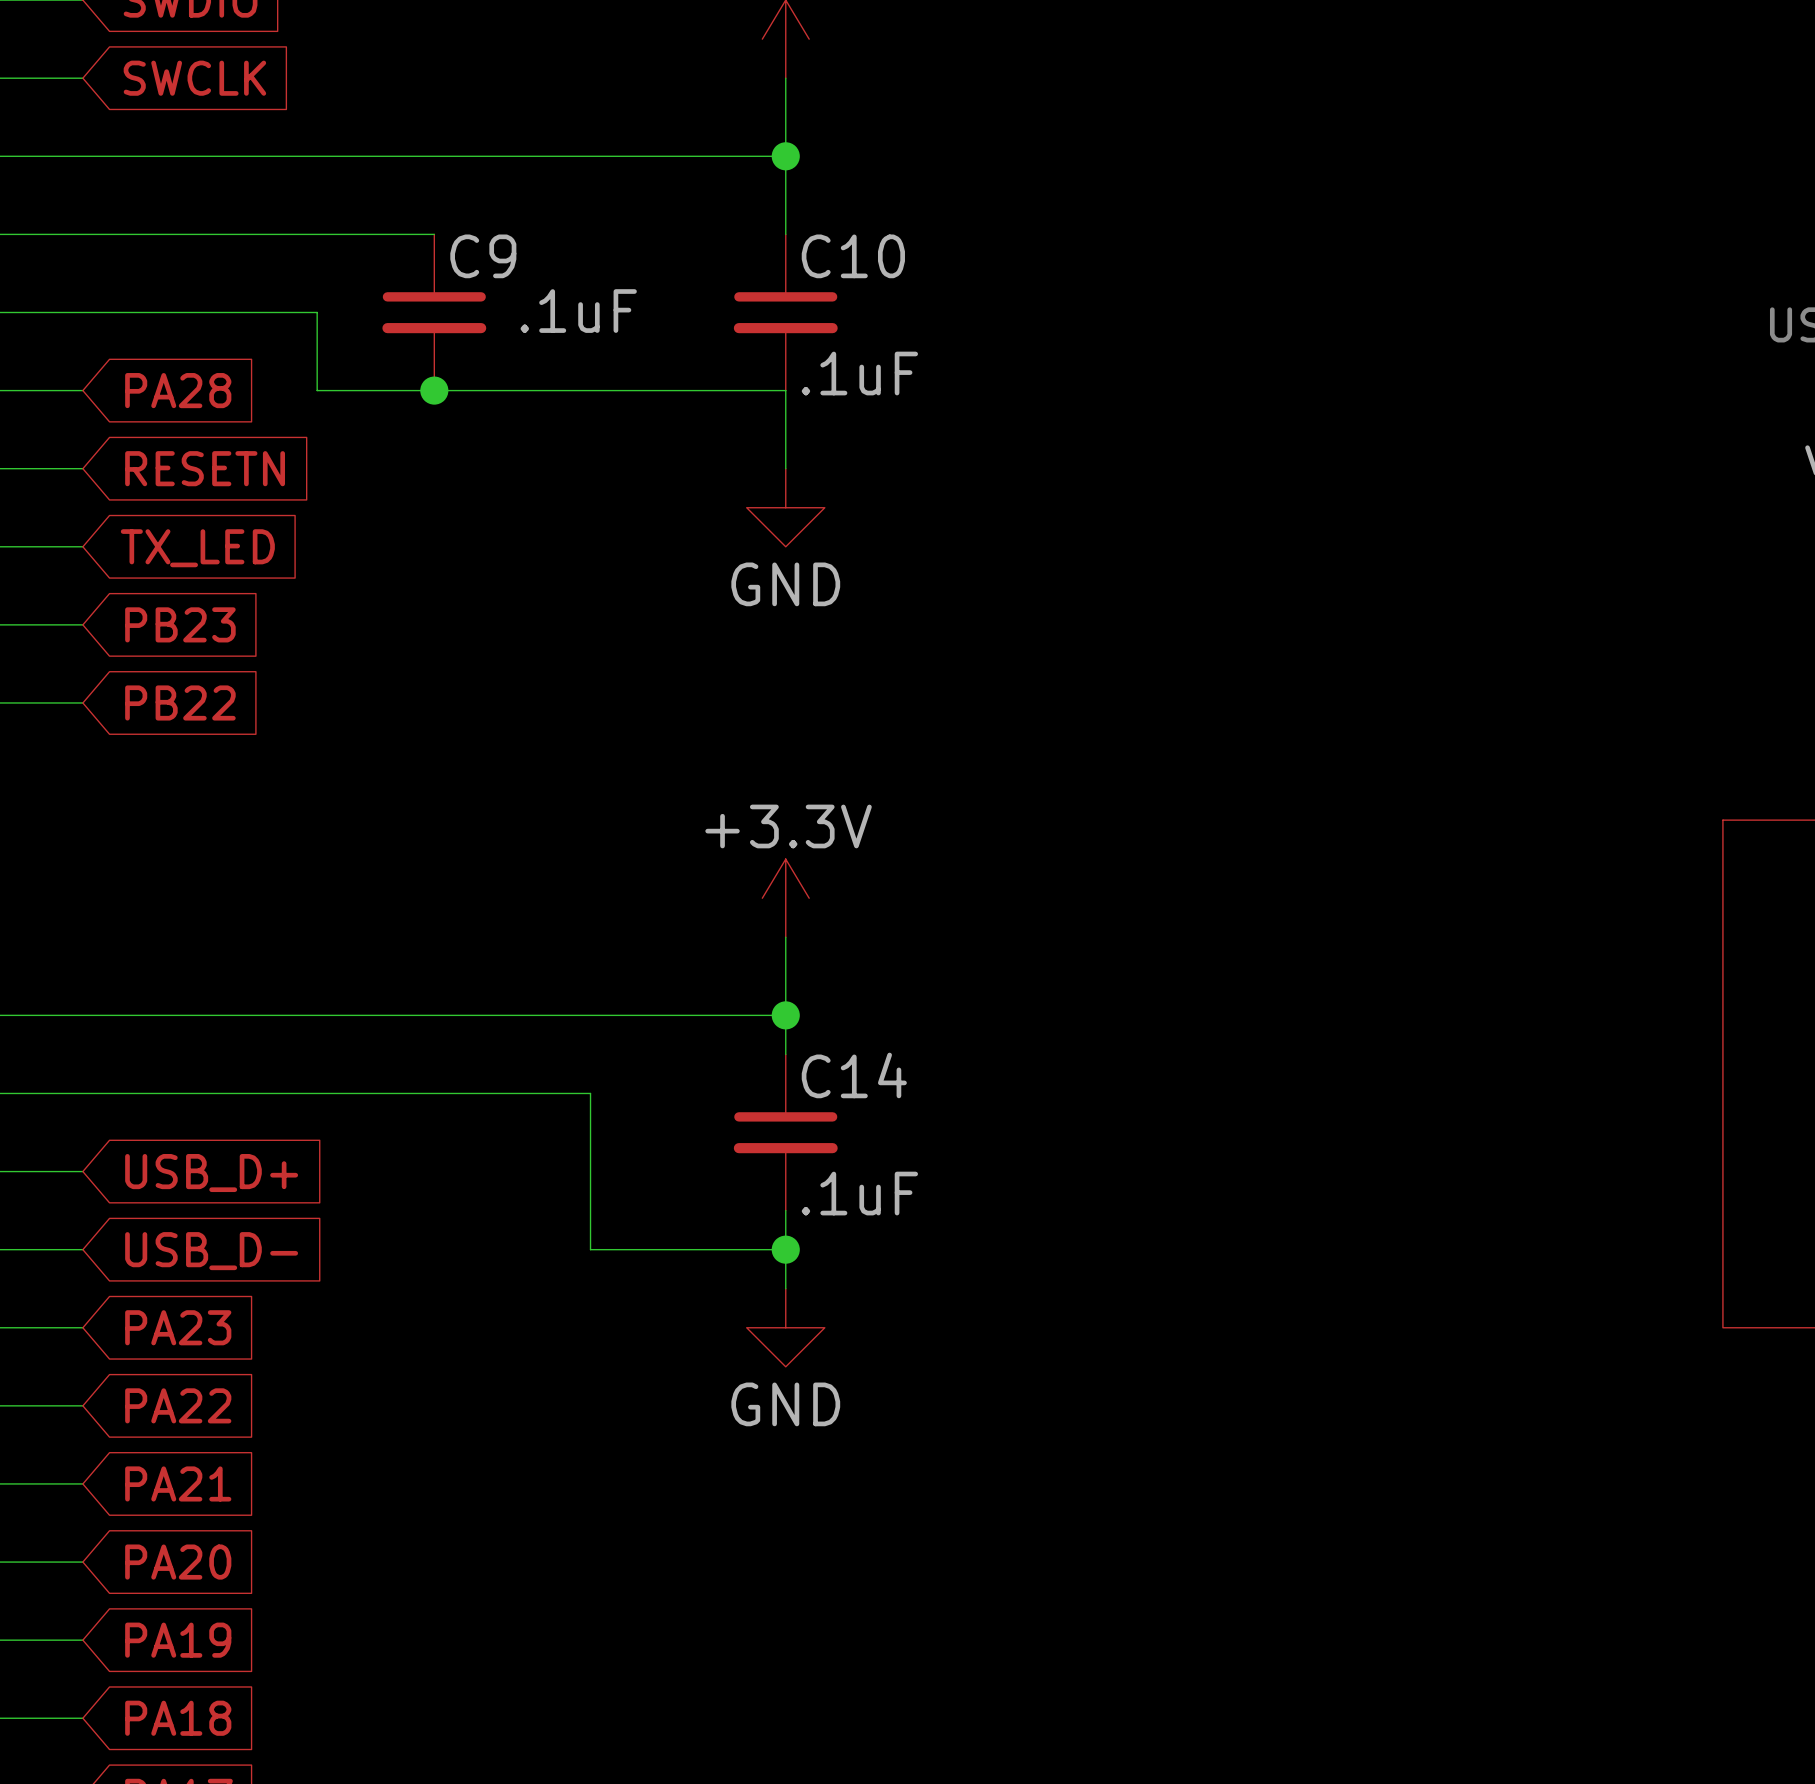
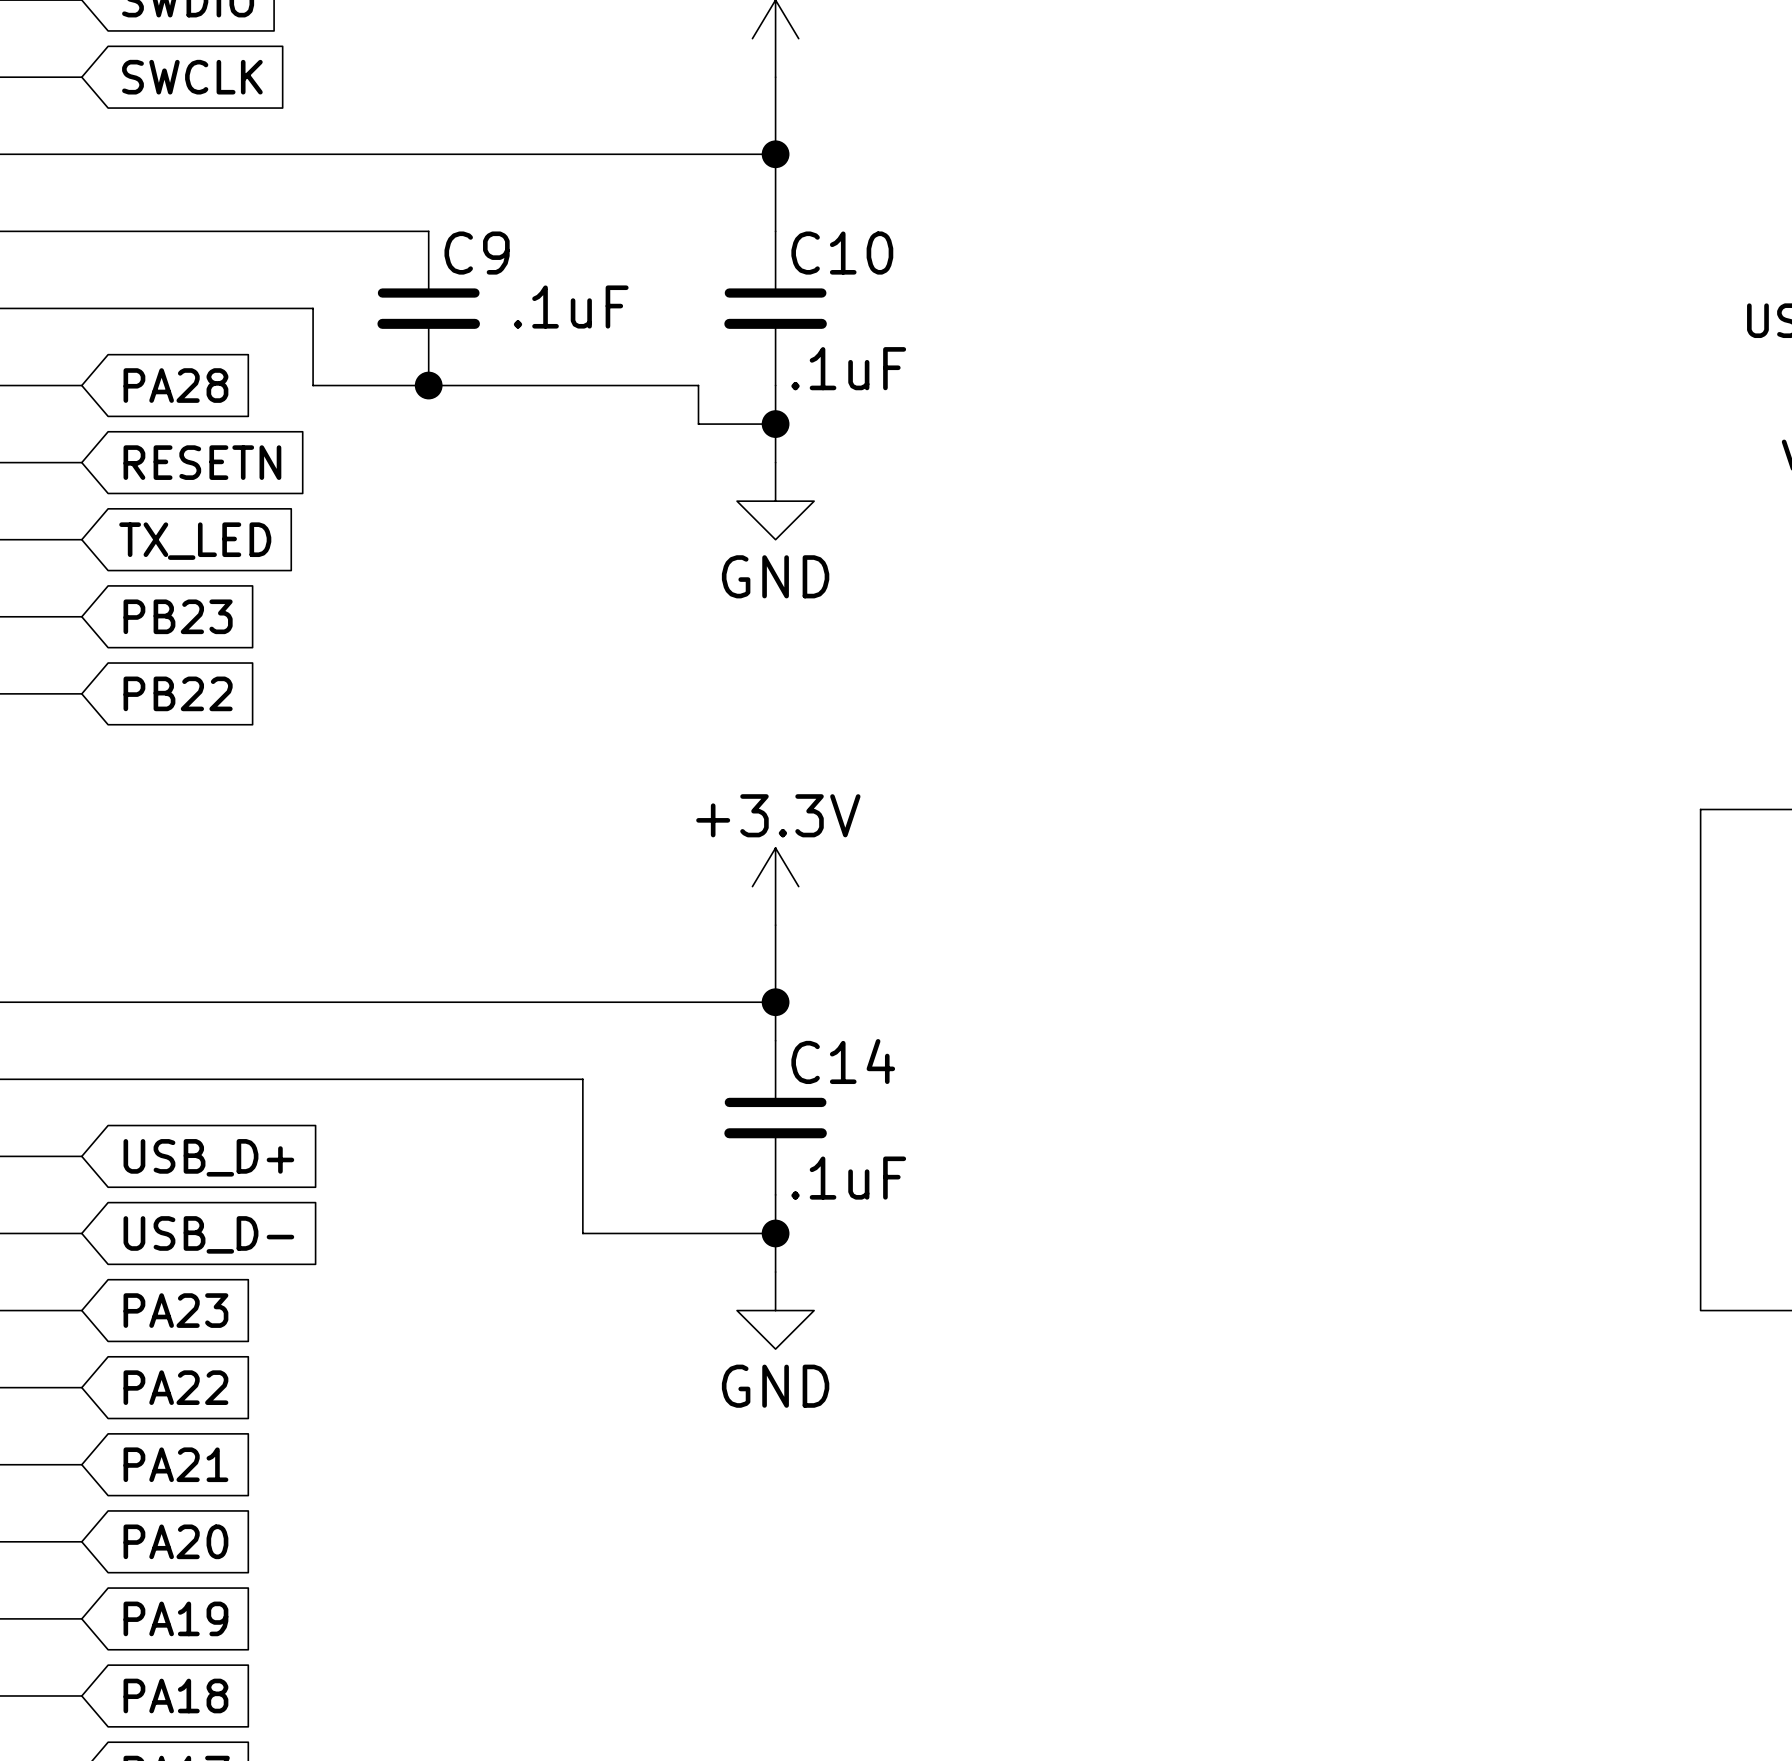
wire: (707, 390) (785, 390) -> (698, 385) (698, 424) (775, 424)
junction: none -> (775, 424)

